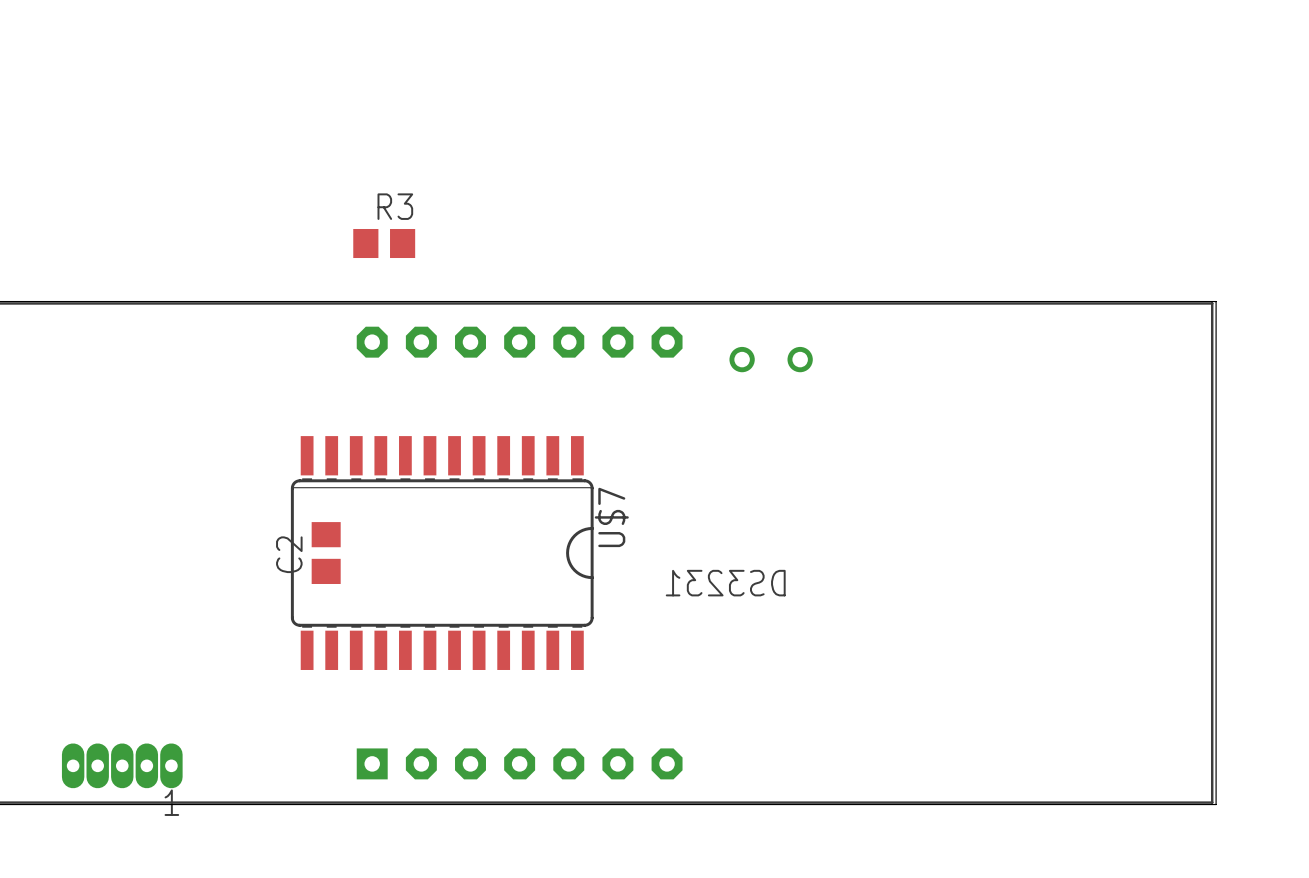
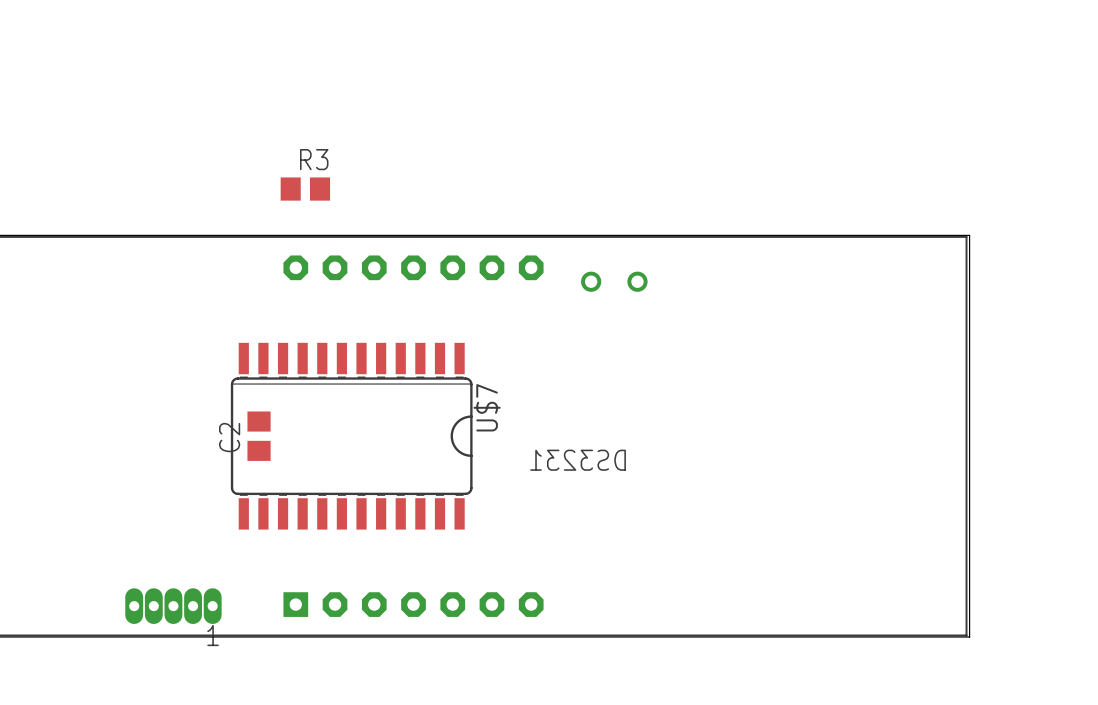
part position: (122, 765) -> (173, 606)

